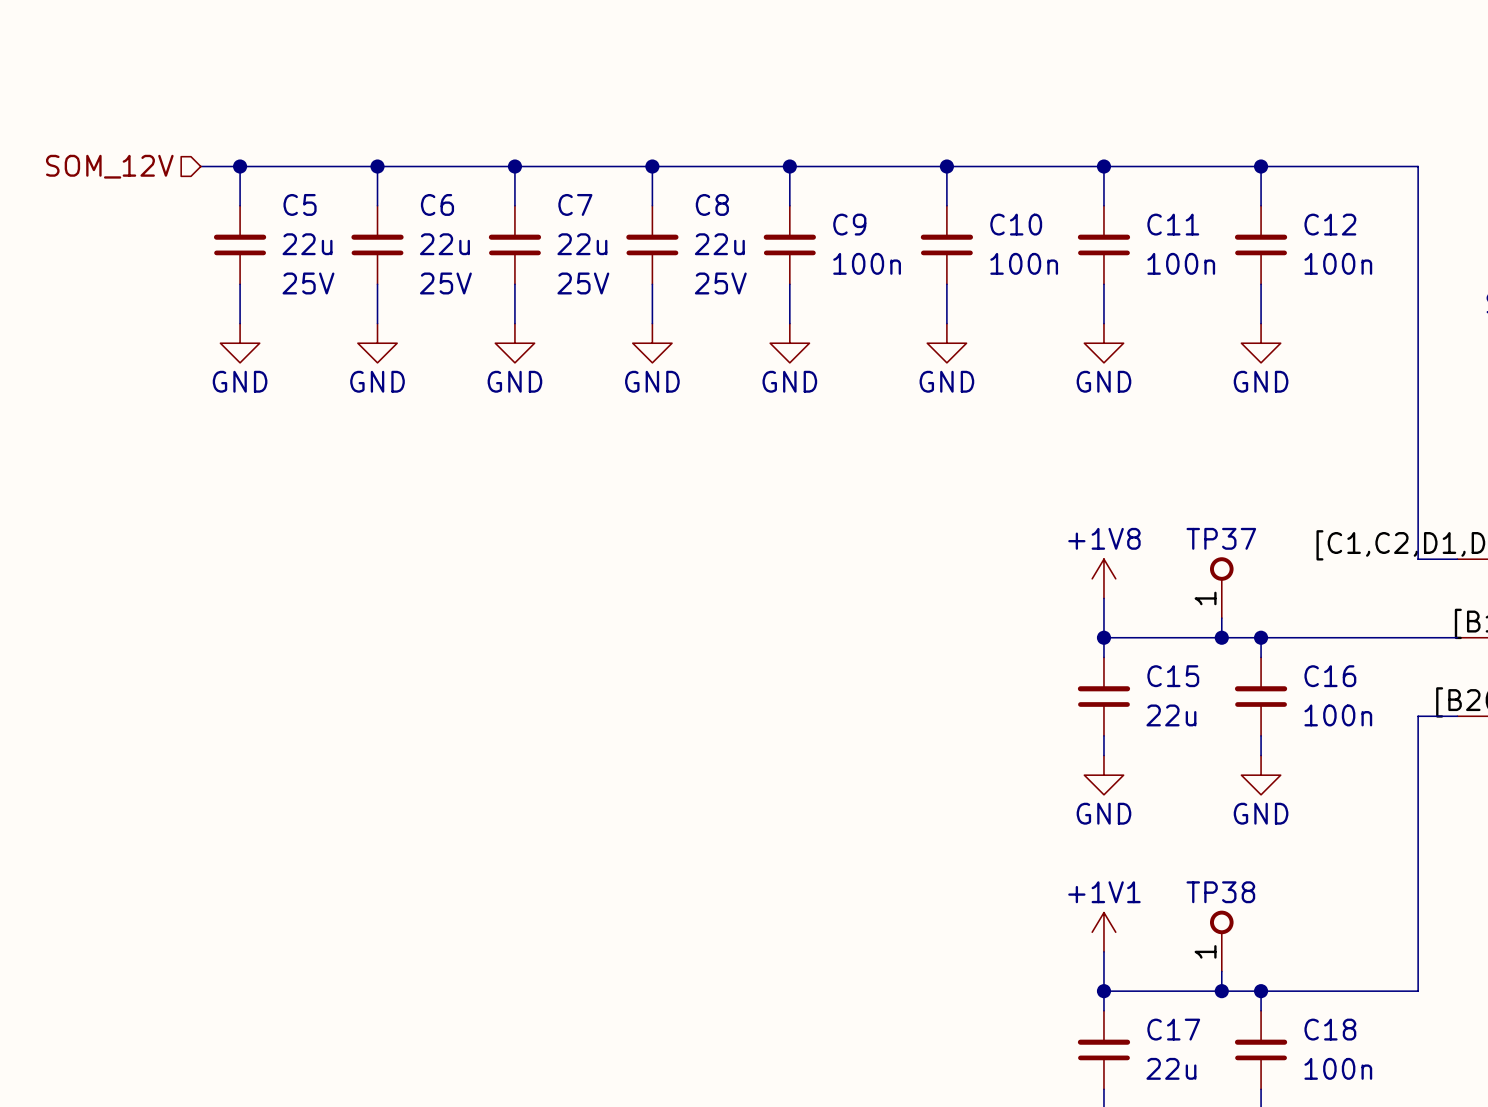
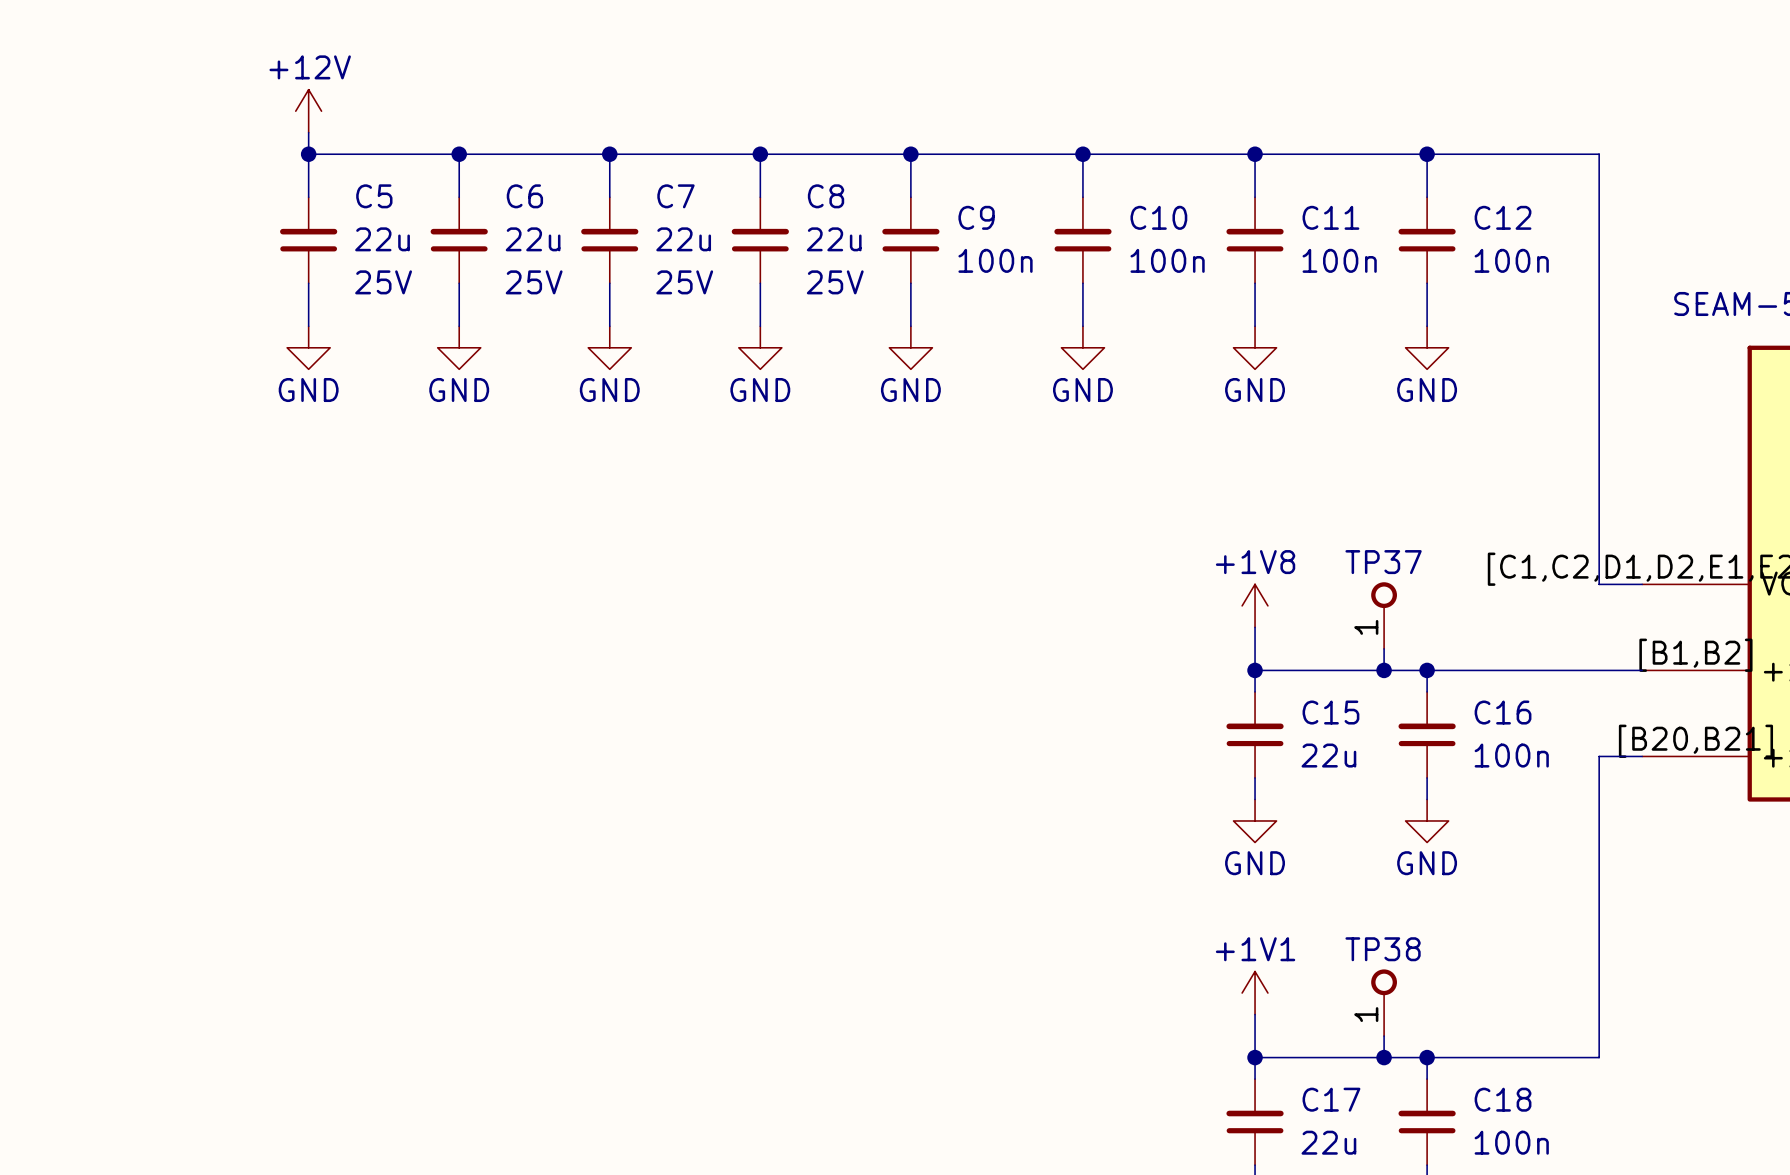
power symbol: none -> +12V (308, 111)
hierarchical label: SOM_12V (109, 166) -> none
wire: (200, 166) (240, 166) -> (308, 132) (308, 154)

